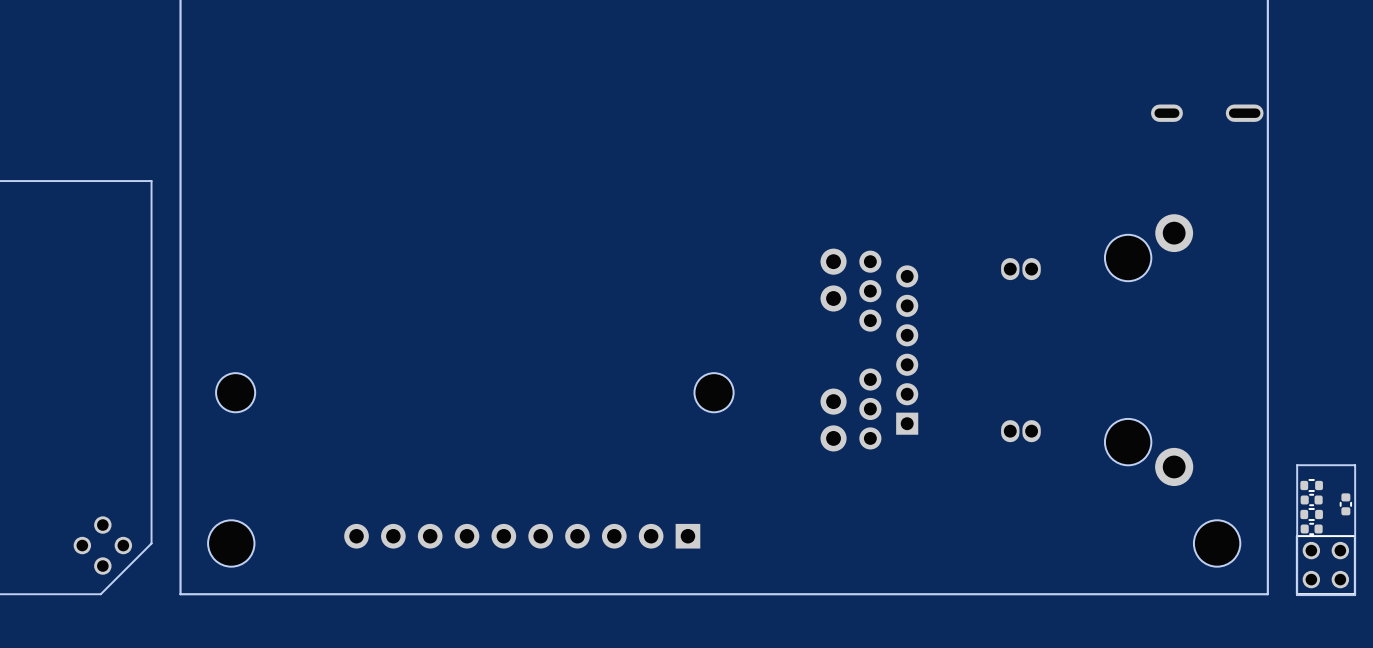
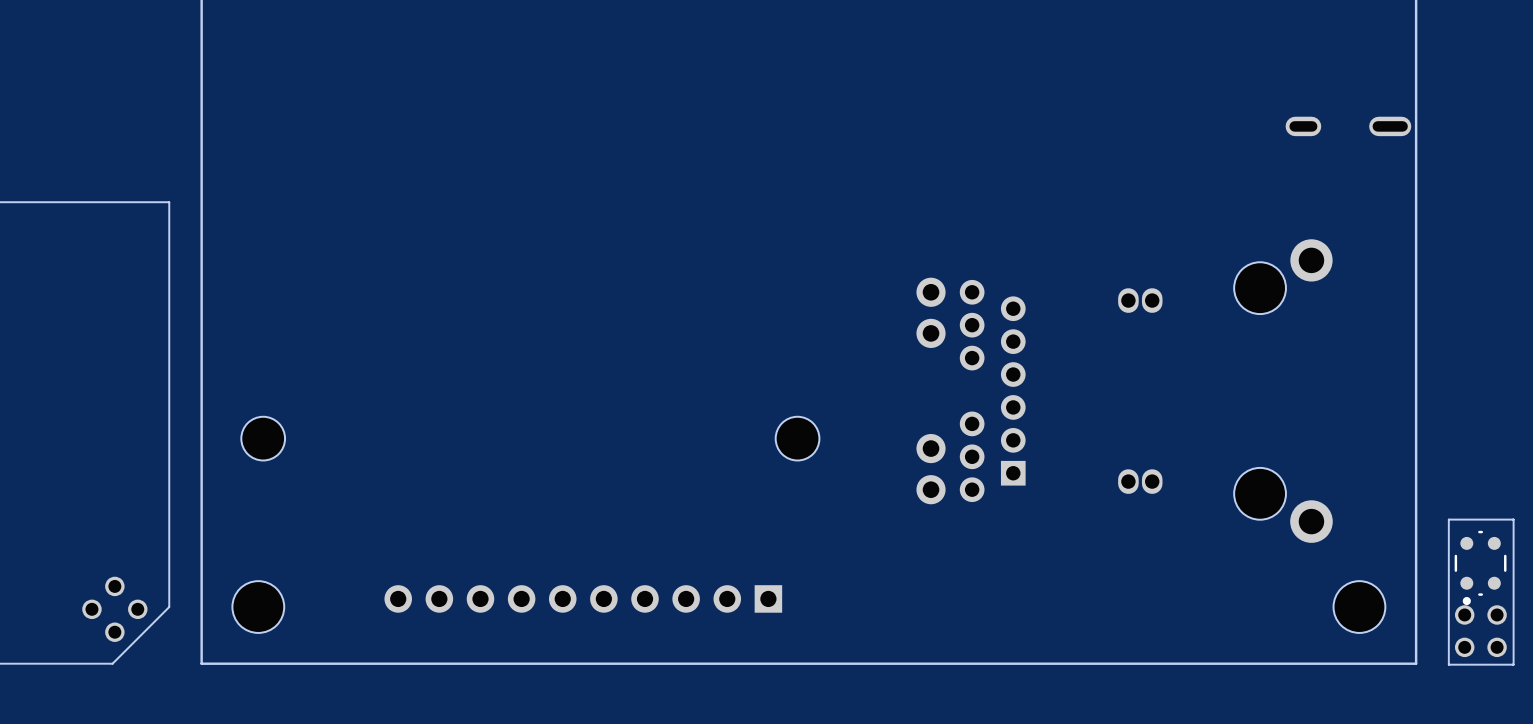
part: (1311, 485) -> none
part: (1311, 499) -> none
part: (1345, 504) -> none
part: none -> (1480, 567)
part: (1311, 514) -> none
part: (1311, 528) -> none
part side: bottom (1325, 565) -> top (1480, 631)

